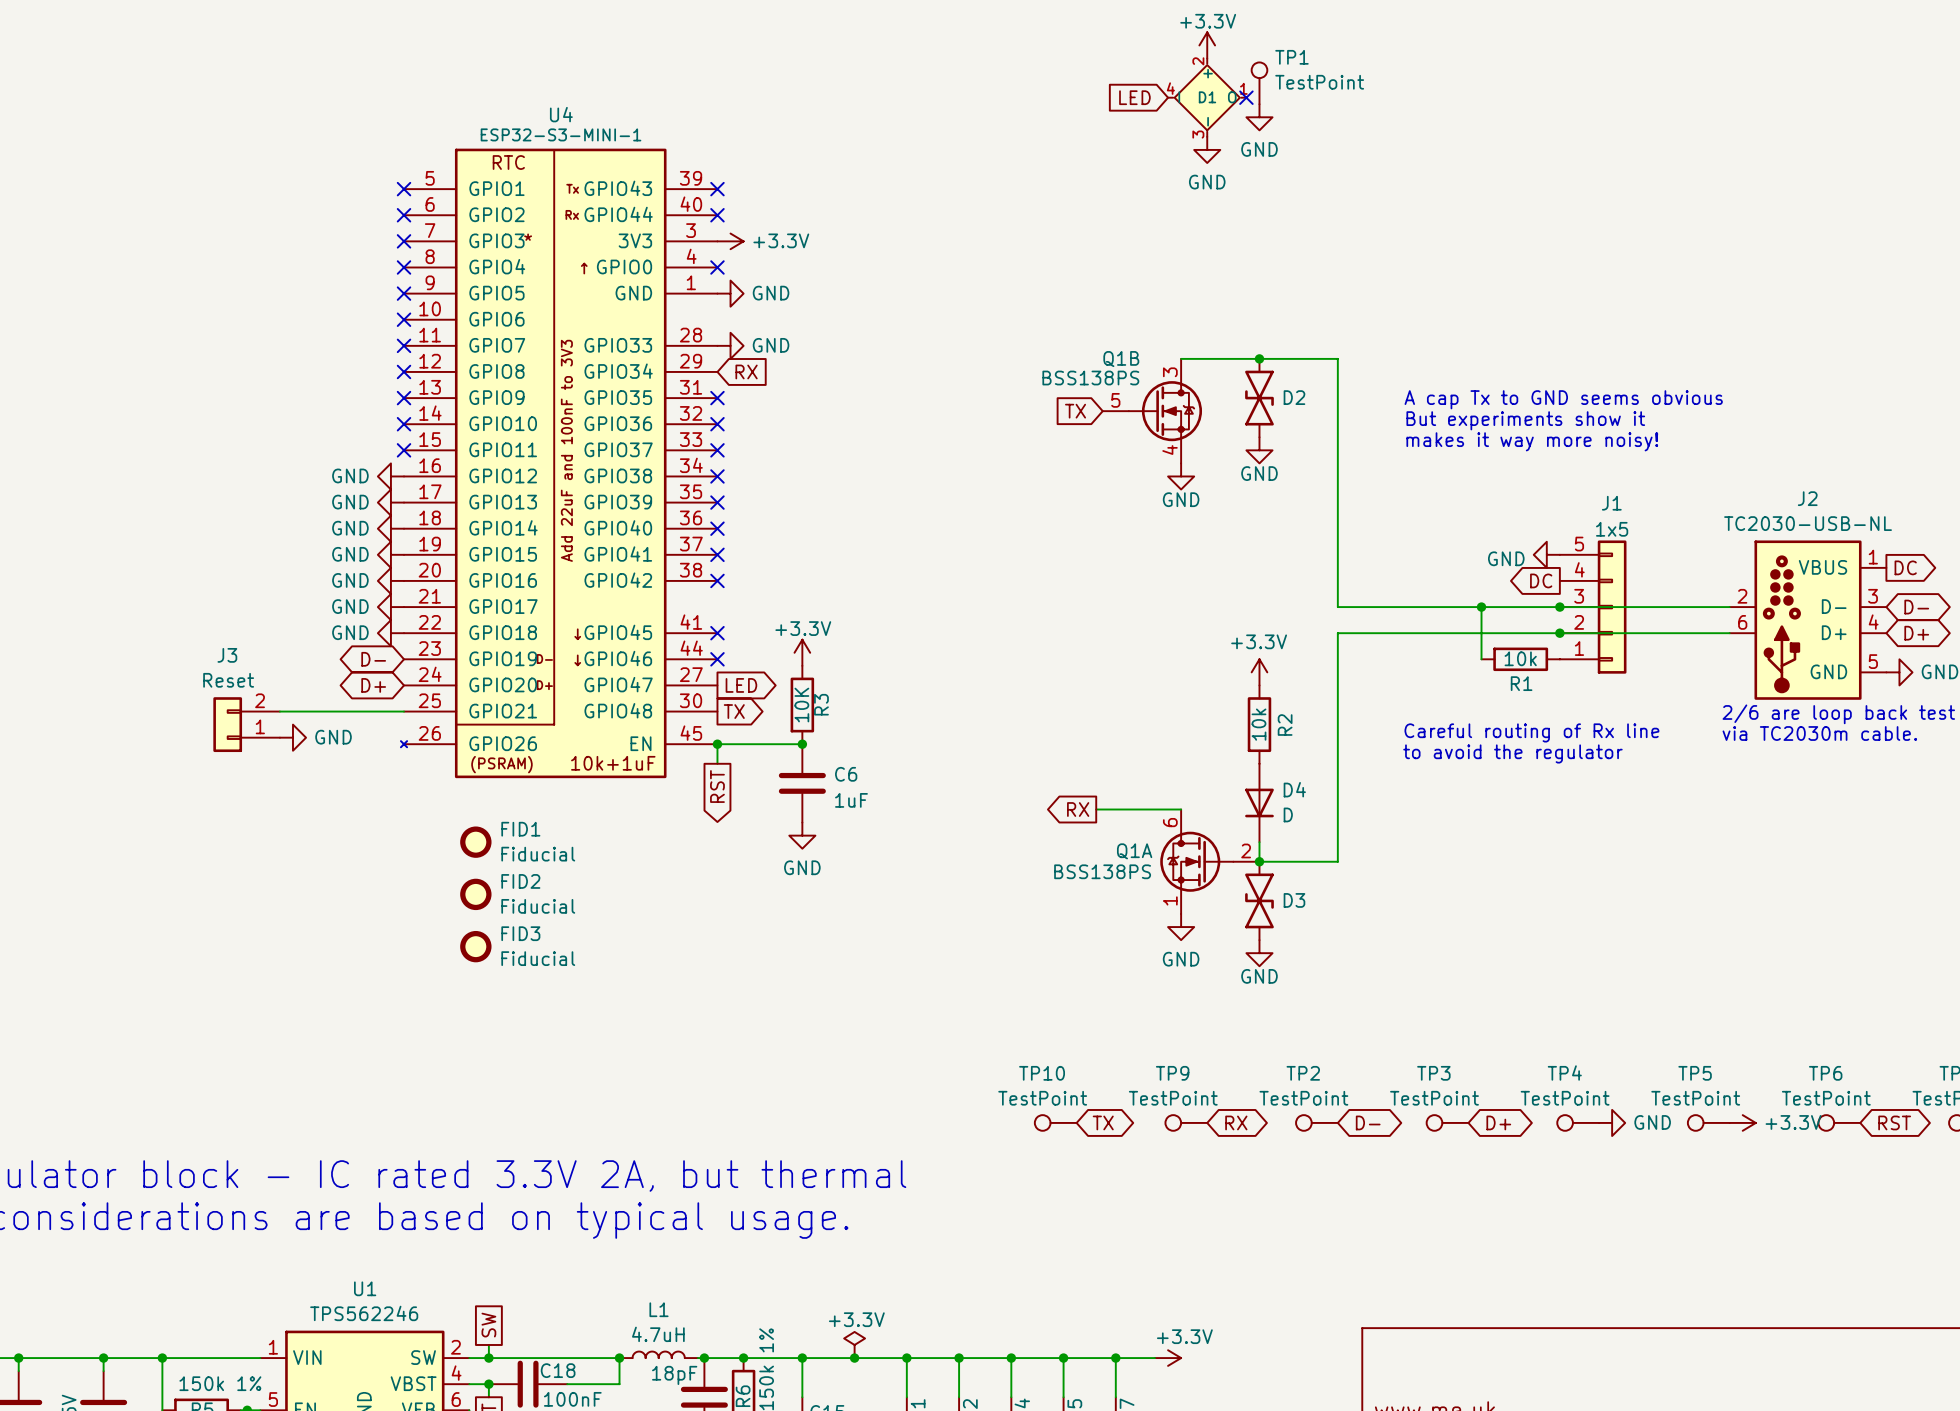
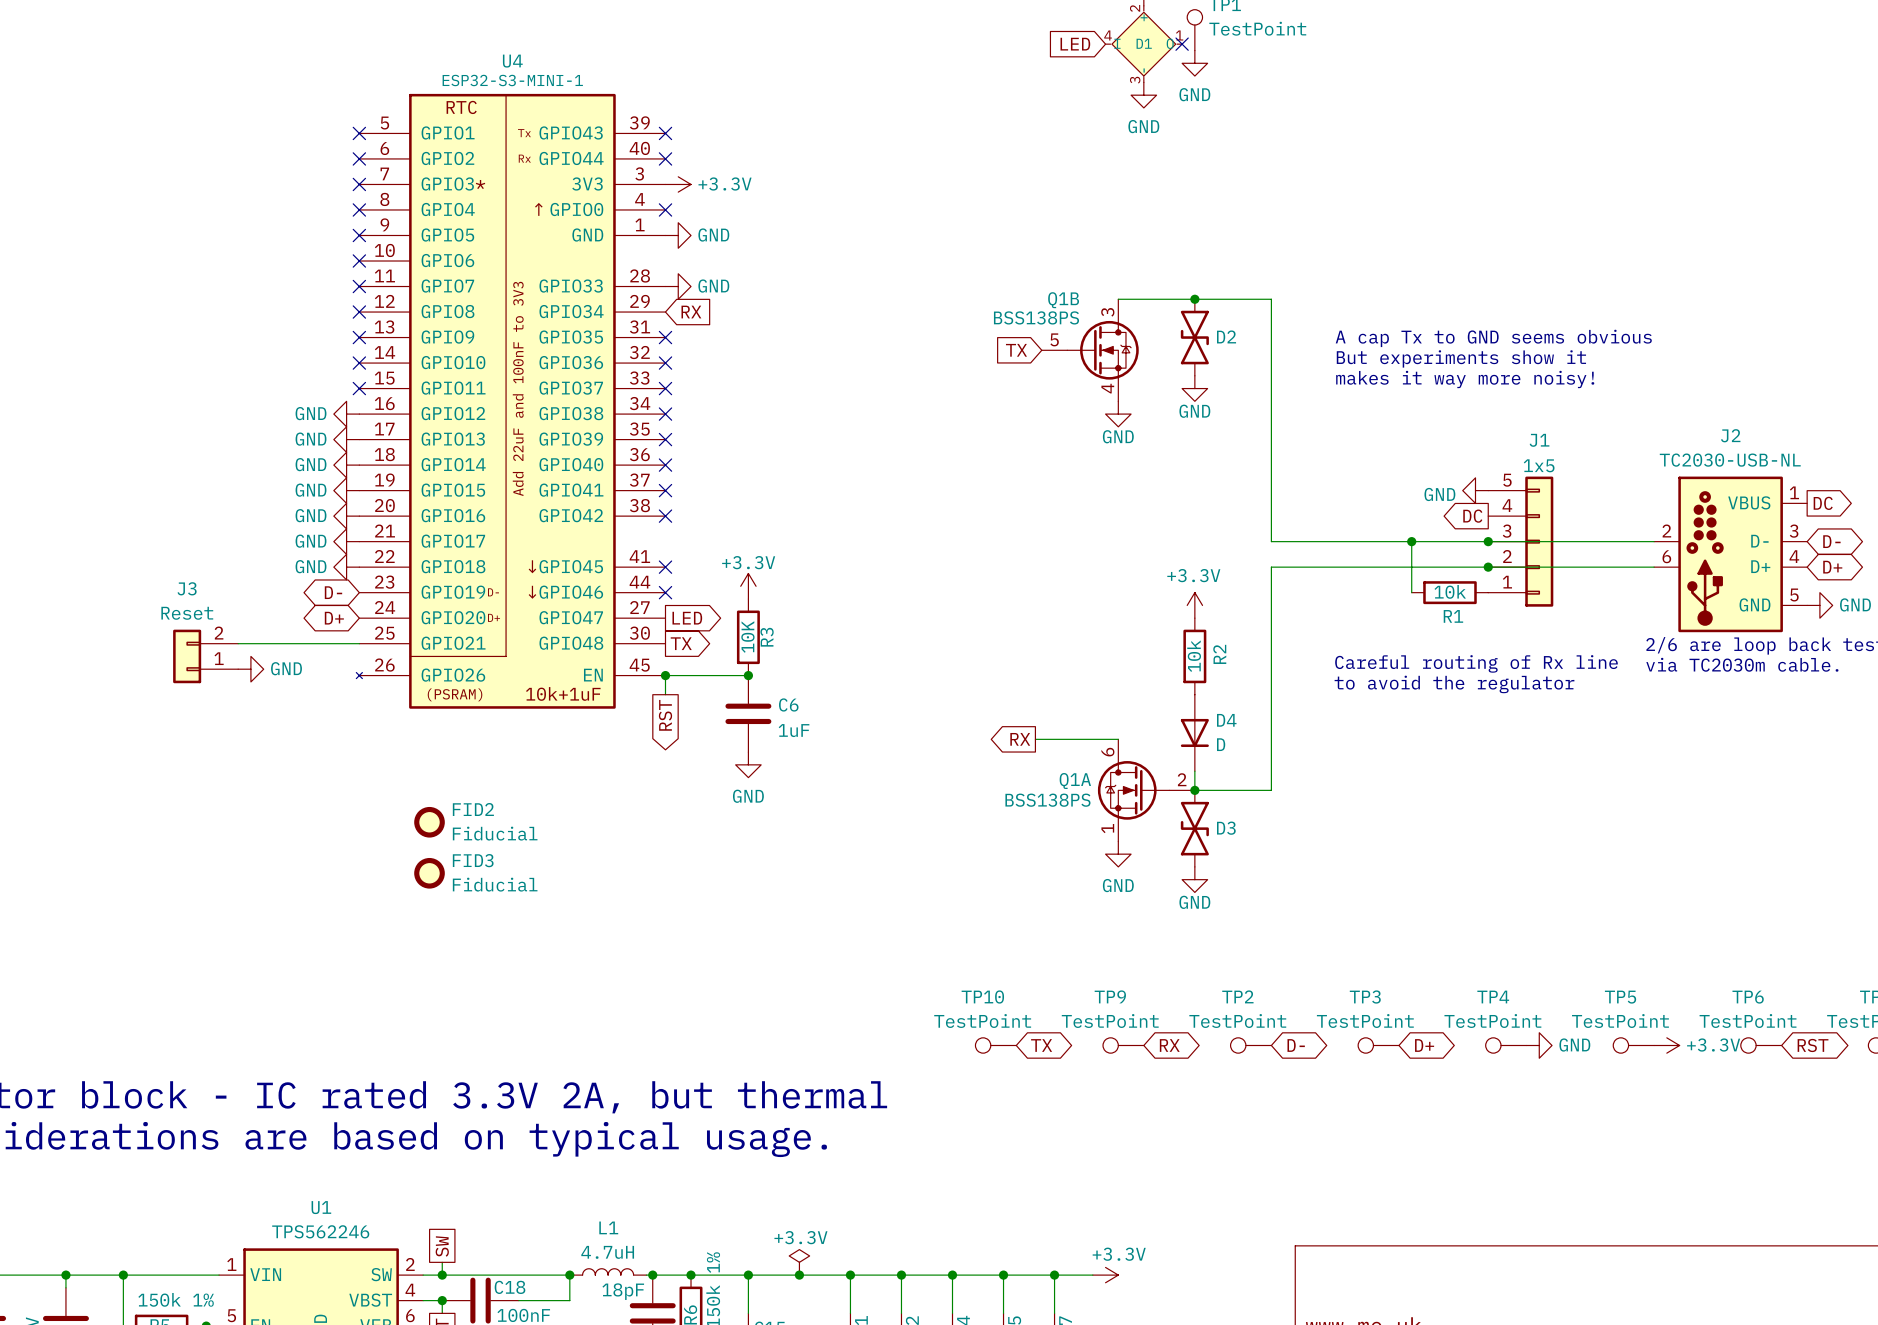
FID1: Fiducial (475, 842) -> none

